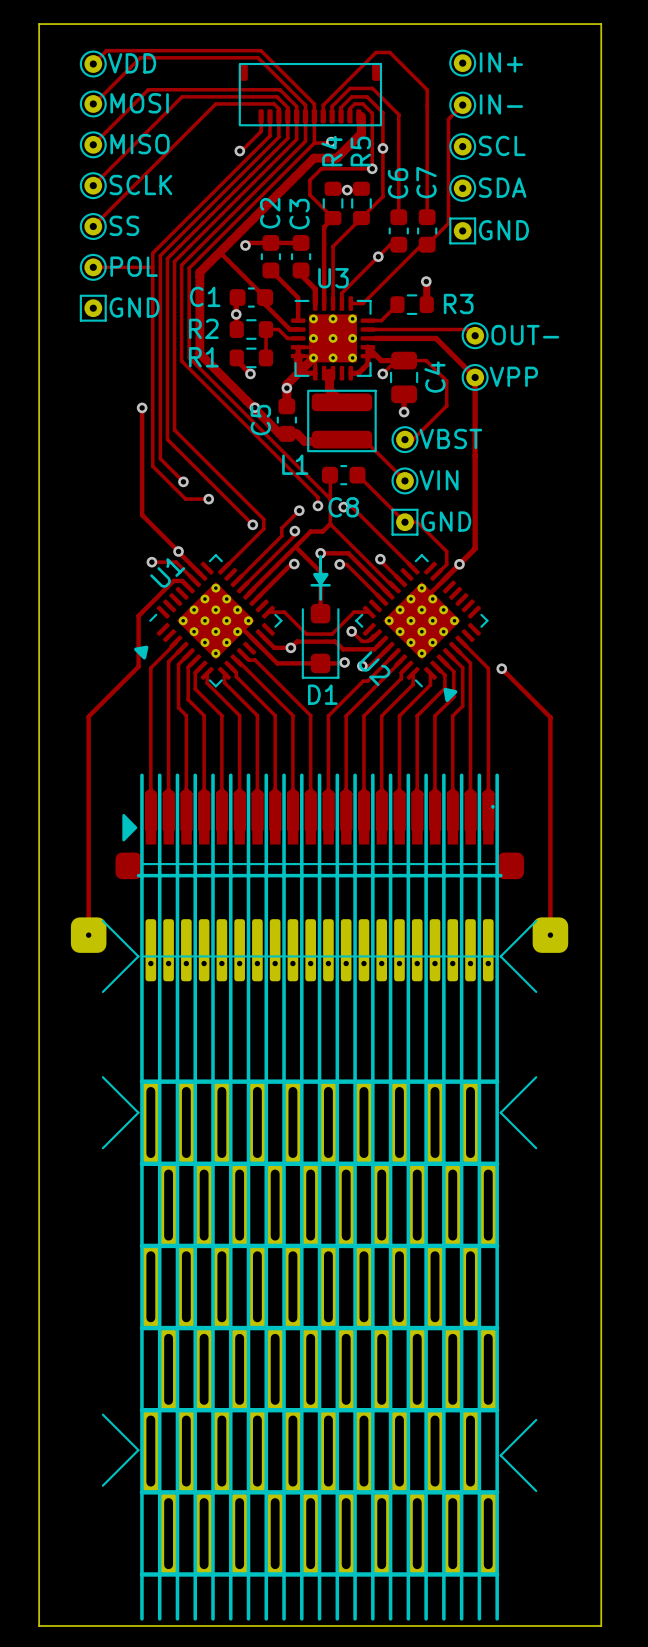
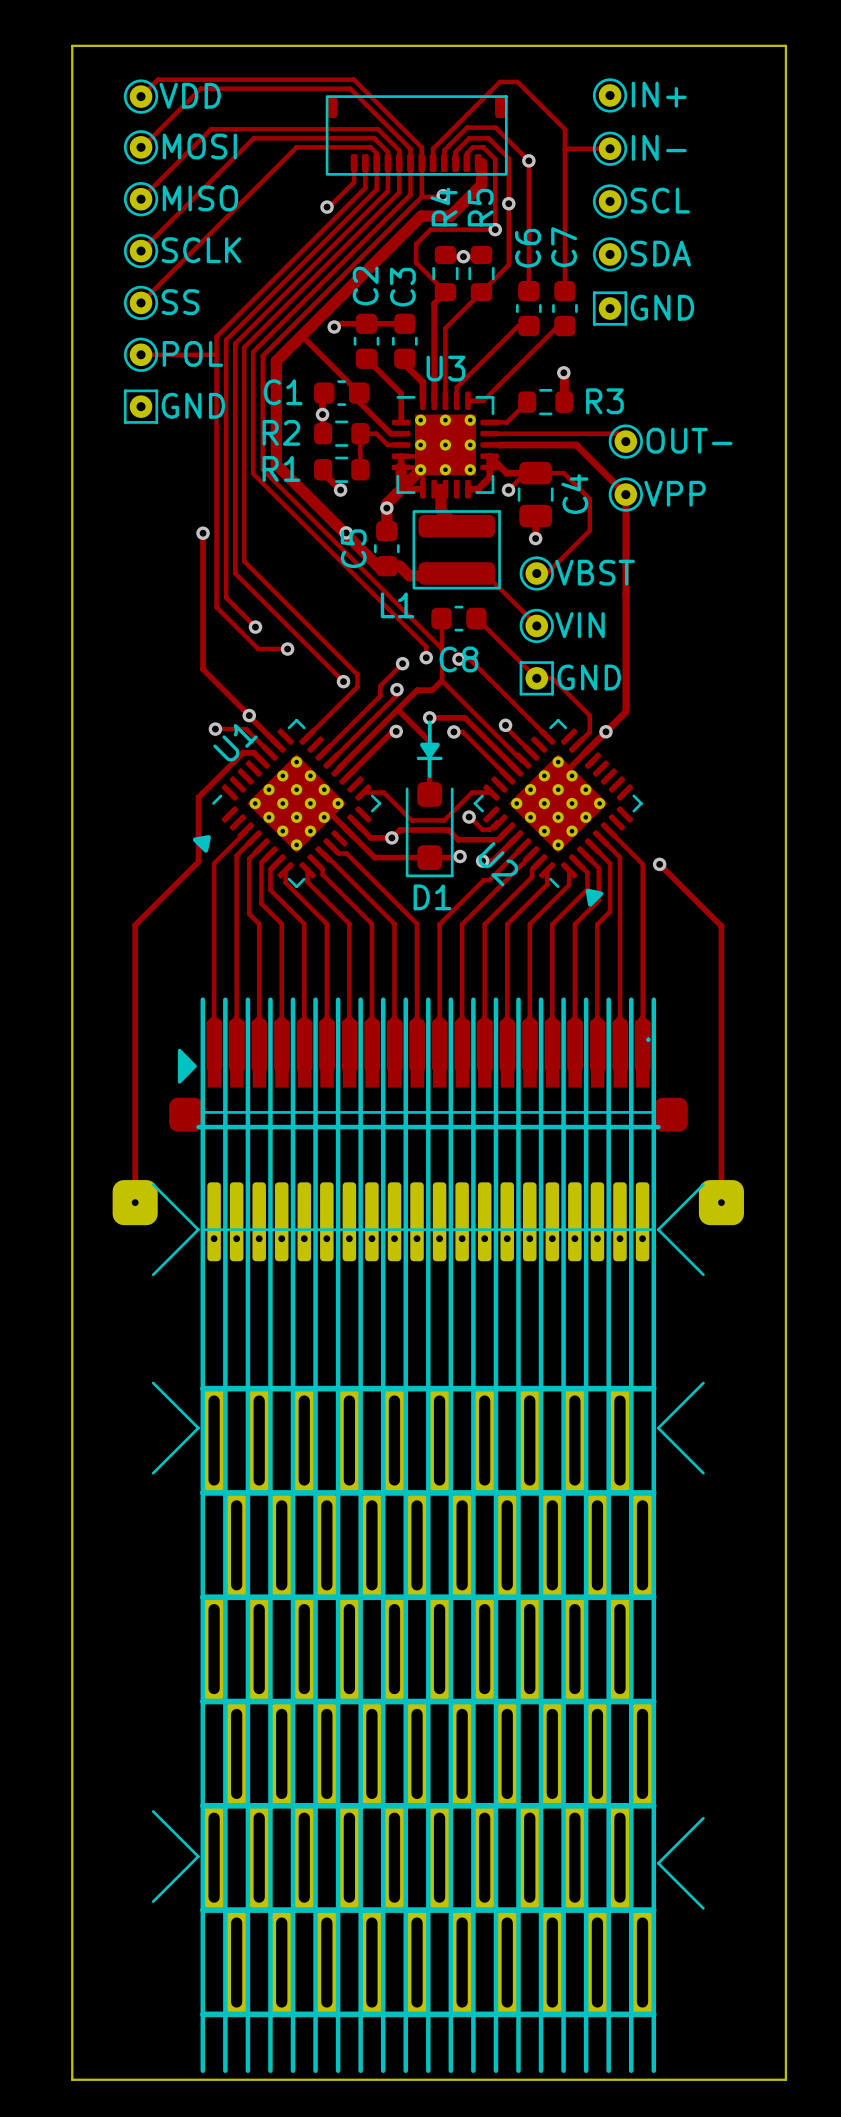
track: (462, 105) (448, 119) (448, 223) (427, 244) -> (610, 148) (564, 149)
via: none -> (528, 160)
via: (378, 256) -> none

